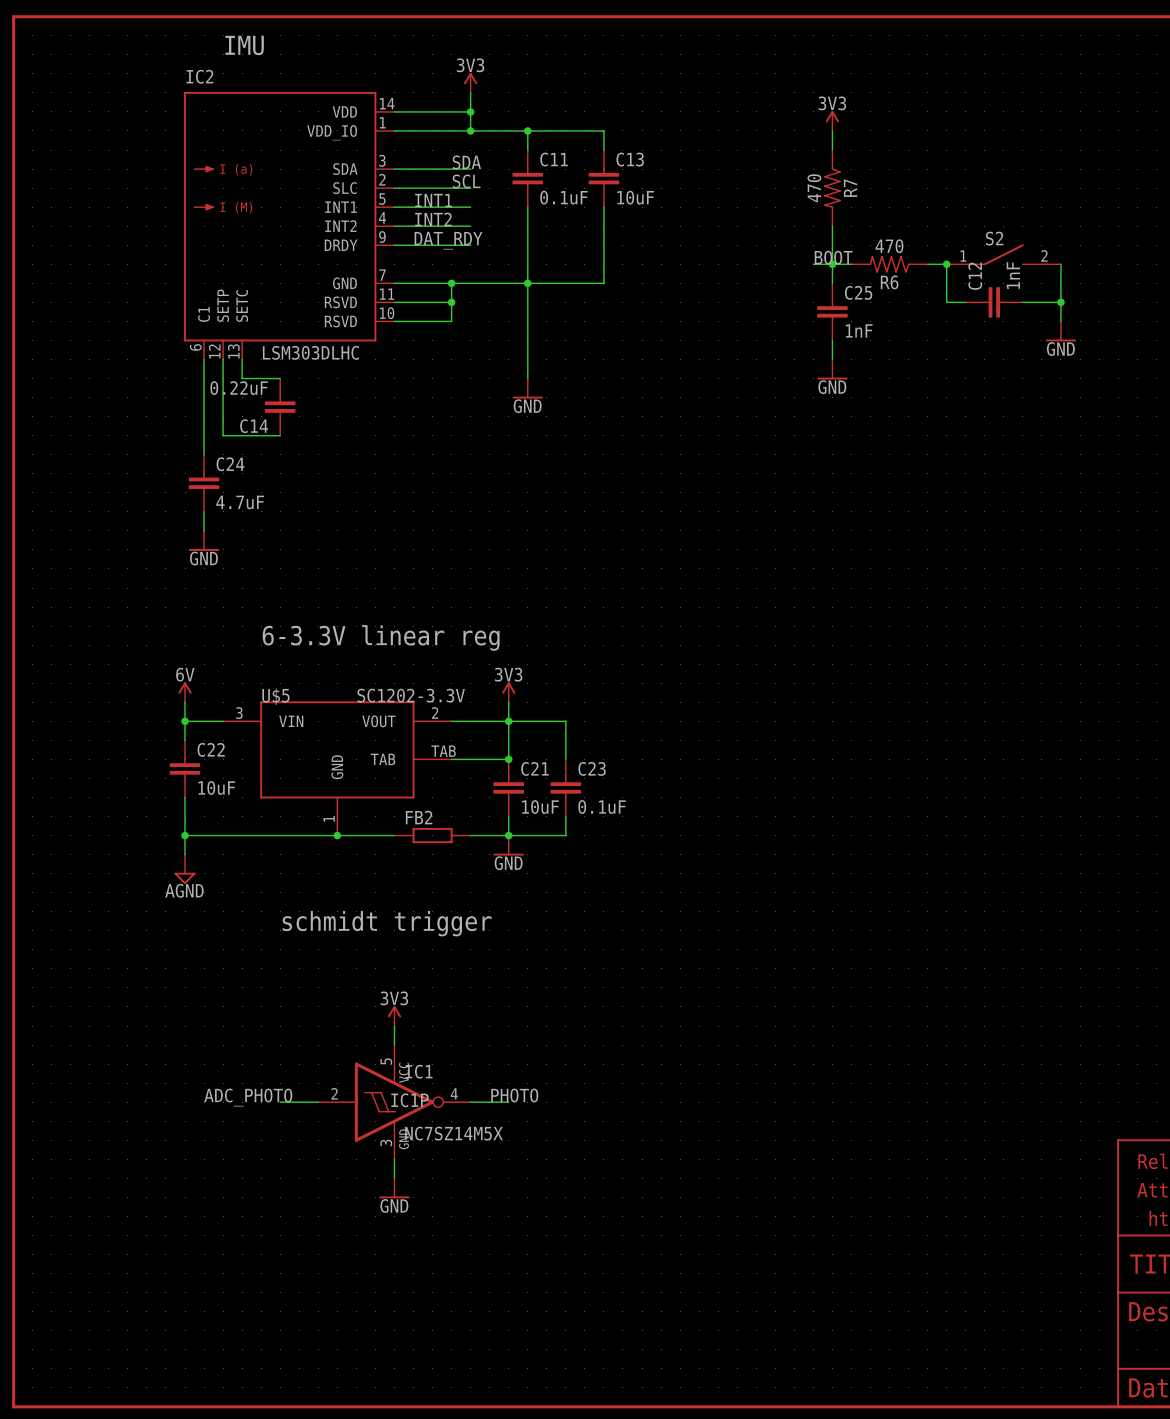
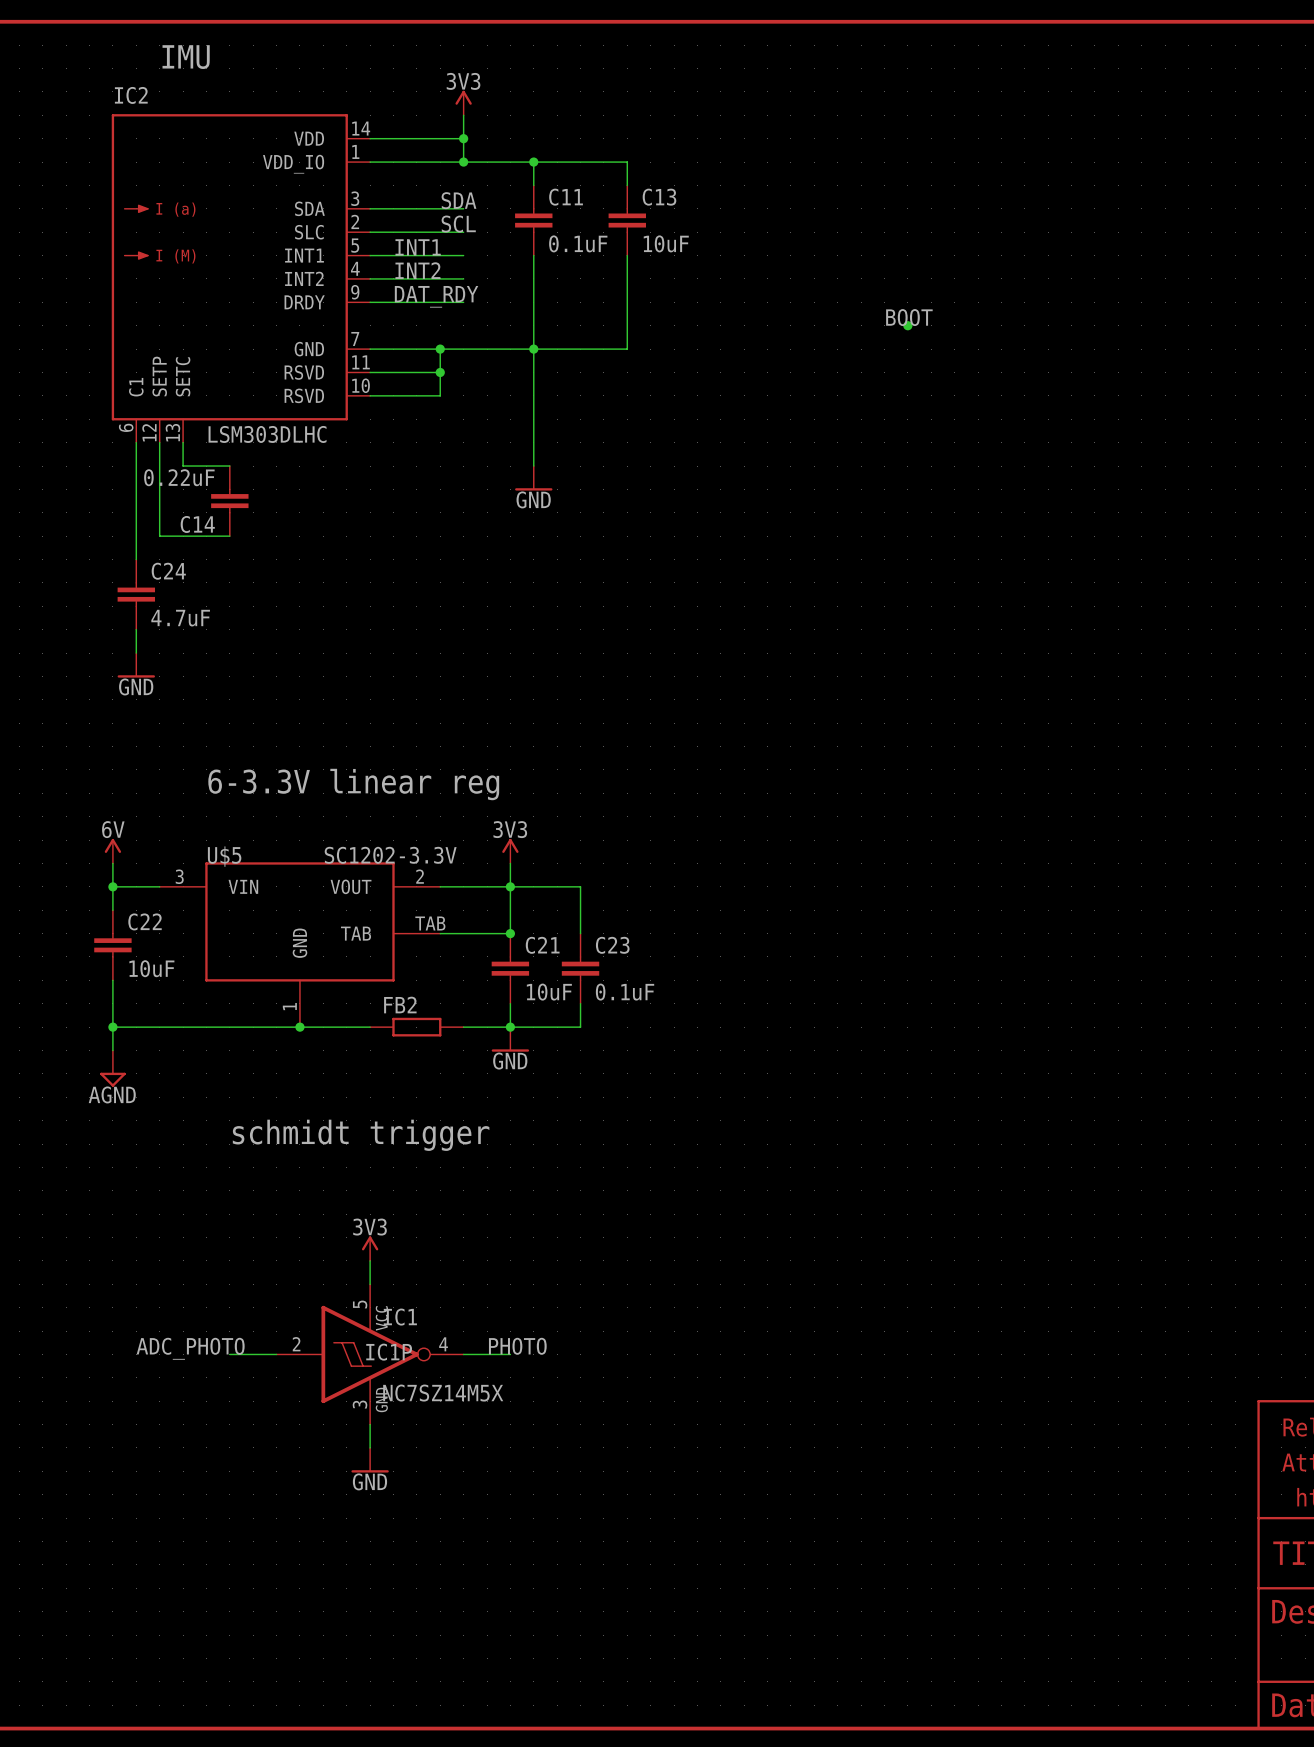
power symbol: 3V3 (832, 121) -> none
wire: (832, 130) (832, 150) -> none
R7: 470 (832, 188) -> none
wire: (832, 226) (832, 283) -> none
text: S2 (994, 238) -> none
part: (1003, 254) -> none
wire: (813, 264) (851, 264) -> none
R6: 470 (889, 264) -> none
wire: (927, 264) (946, 264) (946, 302) (965, 302) -> none
junction: (946, 264) -> none
wire: (1060, 264) (1060, 321) -> none
C12: 1nF (994, 302) -> none
wire: (1022, 302) (1060, 302) -> none
junction: (1060, 302) -> none
C25: 1nF (832, 311) -> none
power symbol: GND (1060, 331) -> none
wire: (832, 340) (832, 359) -> none
power symbol: GND (832, 369) -> none

